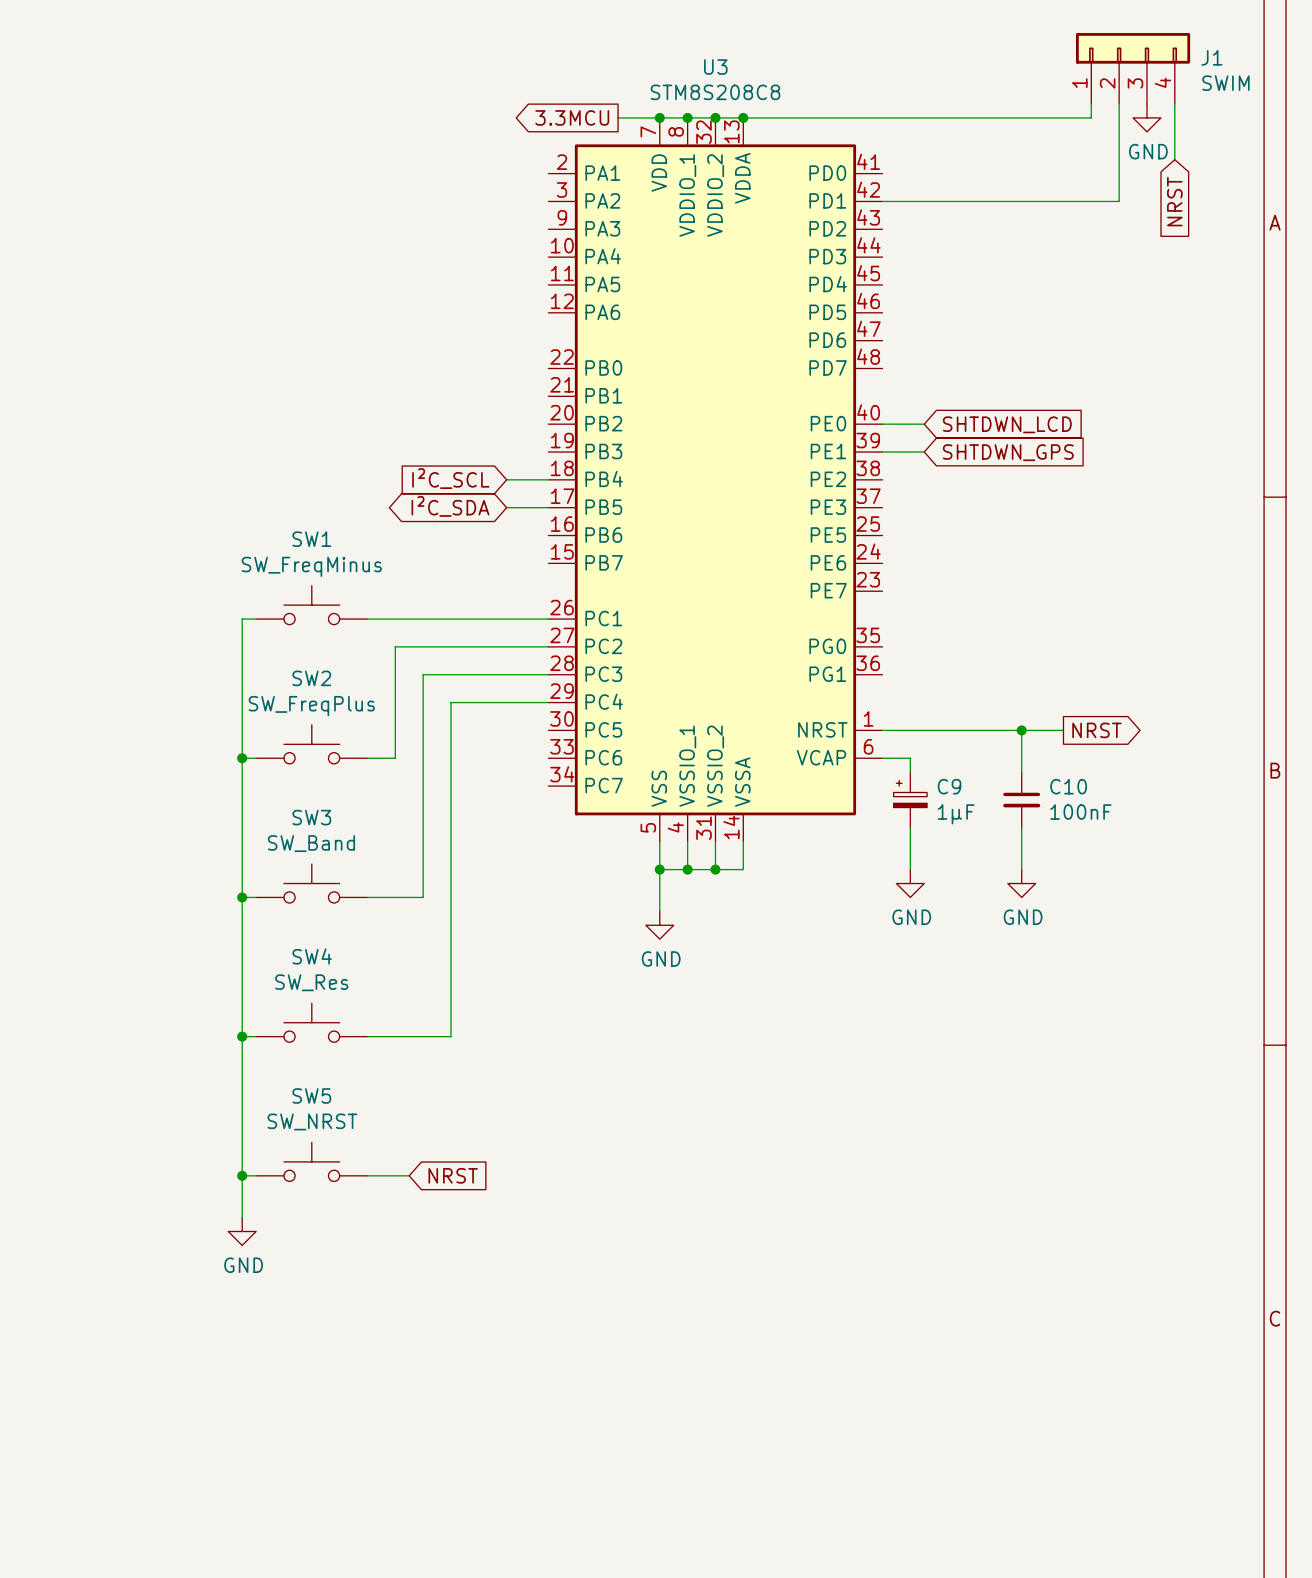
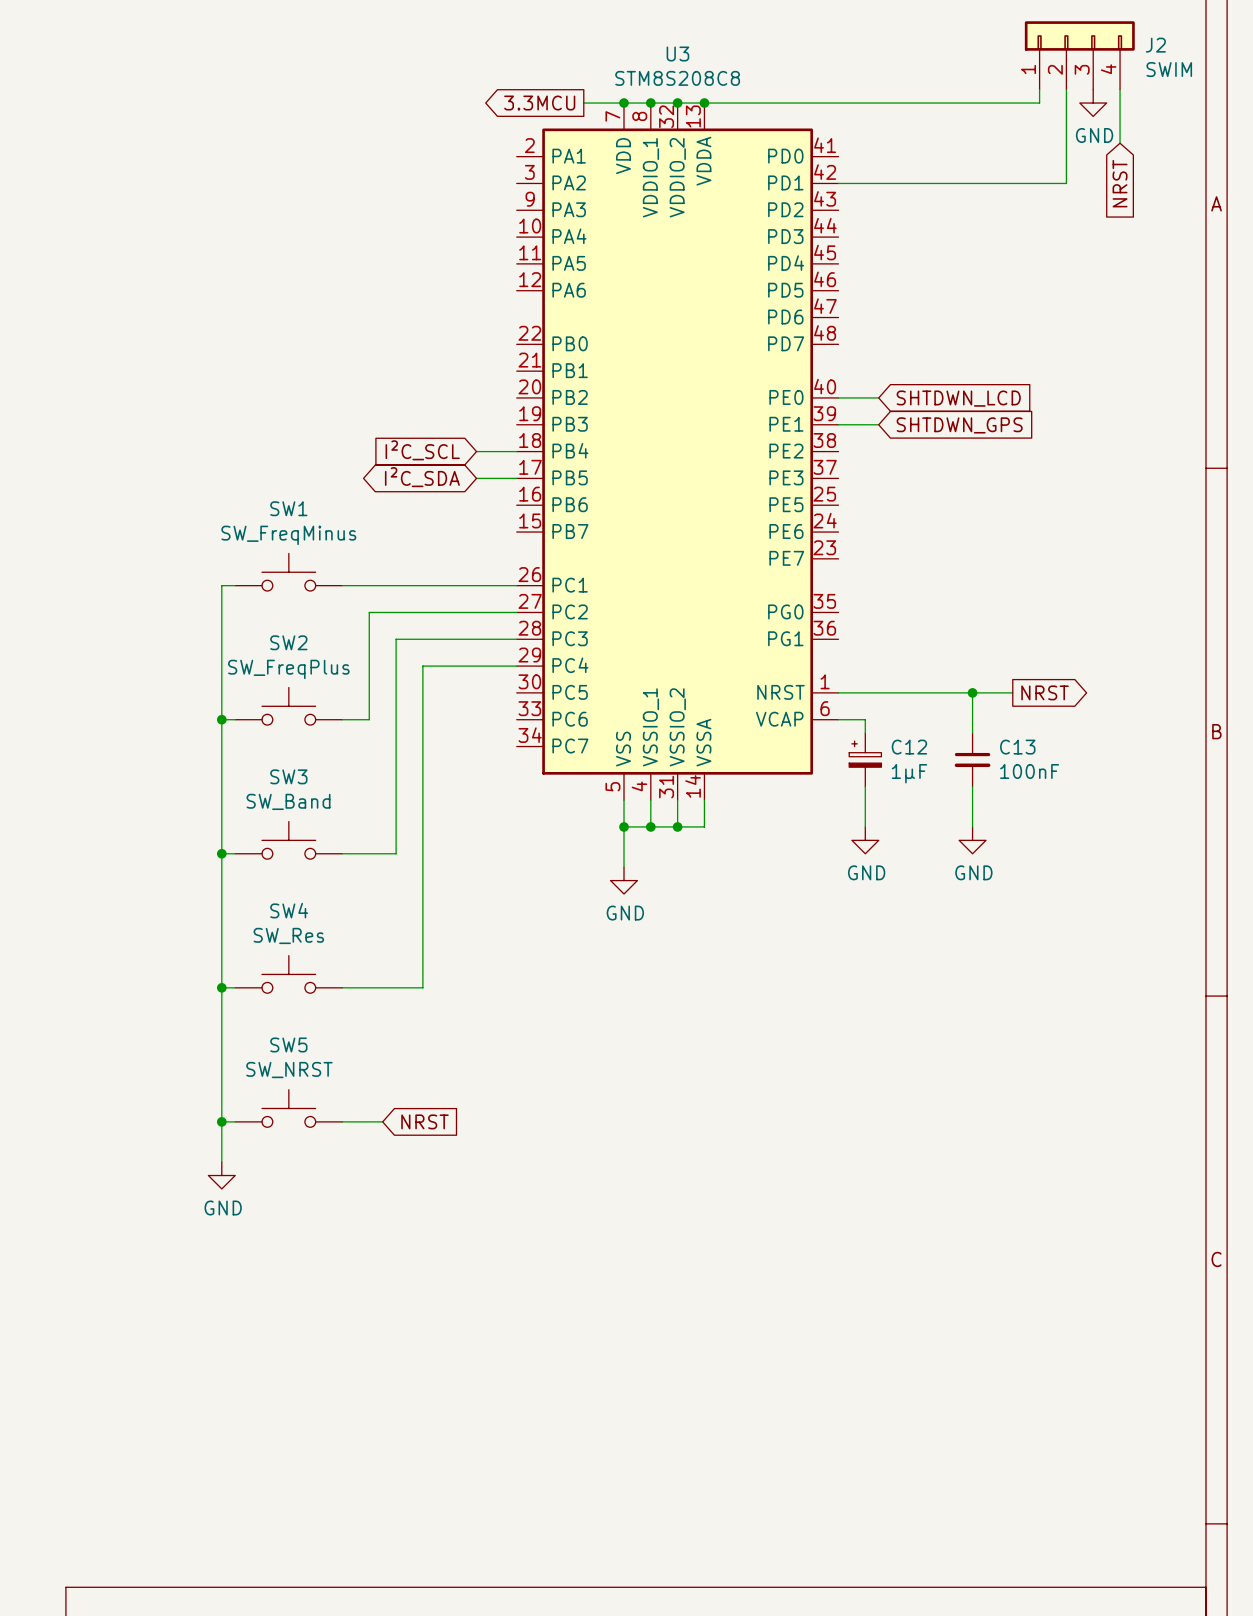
J1 name: J1 (1212, 57) -> J2 (1155, 45)
C9 name: C9 (949, 786) -> C12 (909, 747)
C10 name: C10 (1068, 786) -> C13 (1017, 747)

